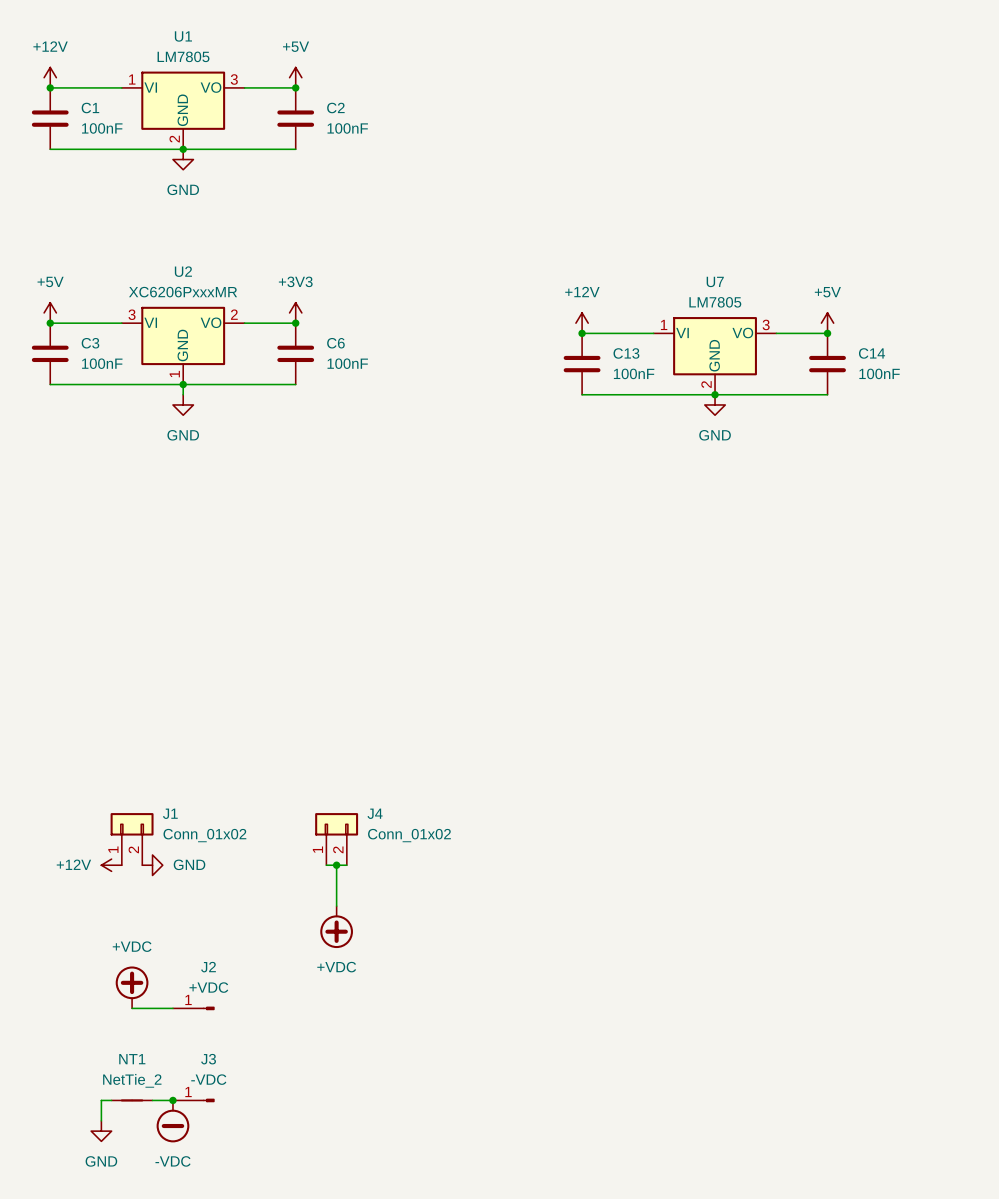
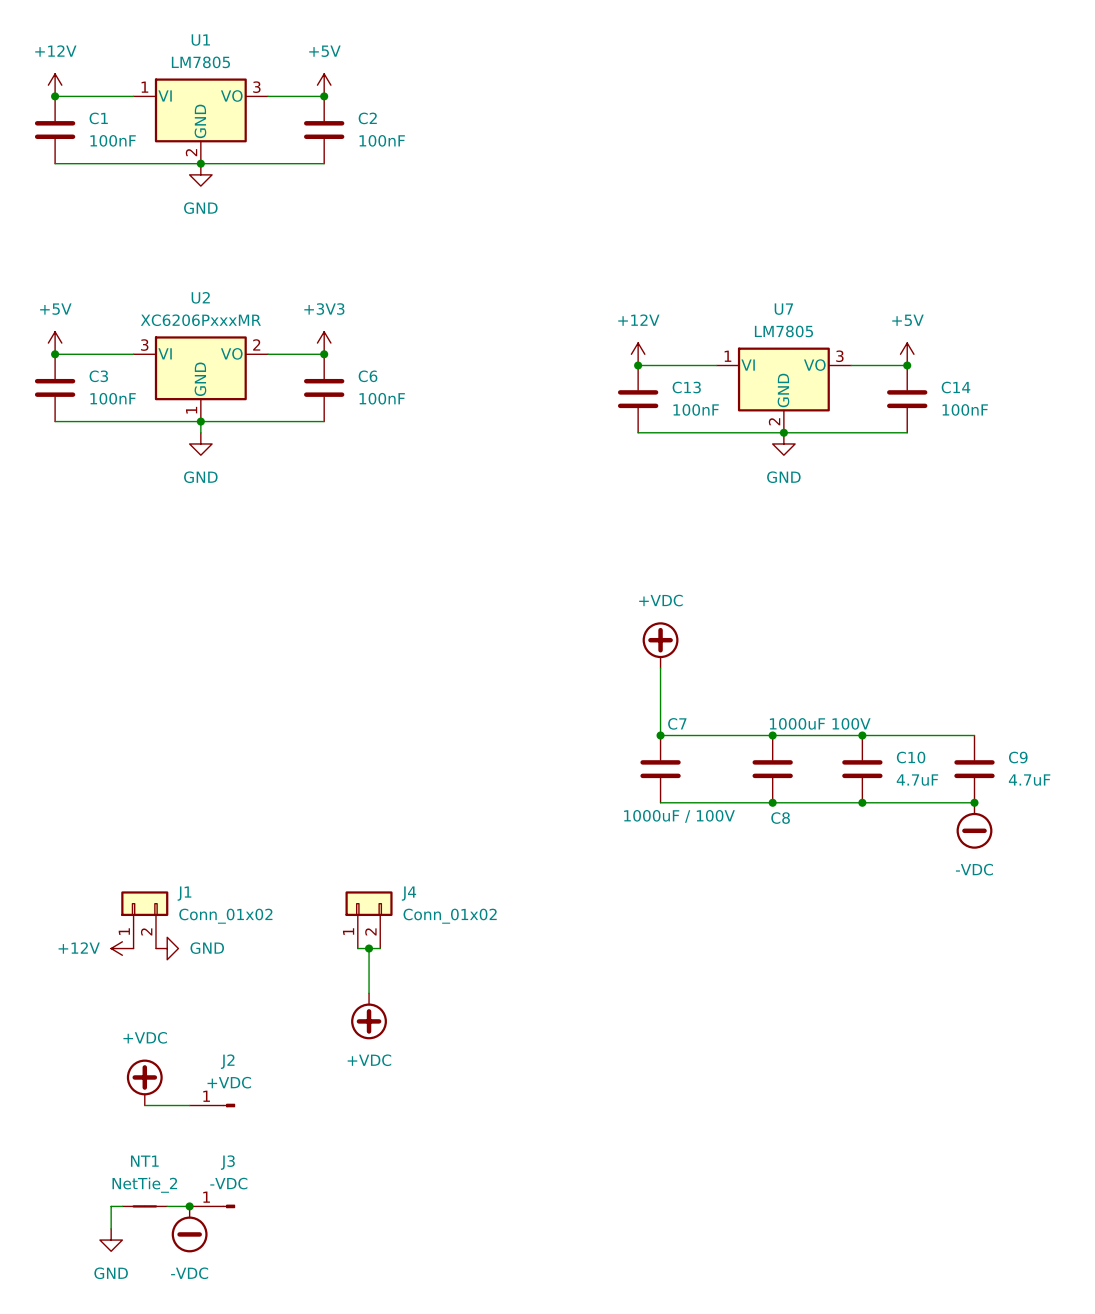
power symbol: none -> +VDC (660, 645)
wire: none -> (660, 668) (660, 735) (974, 735)
junction: none -> (660, 735)
junction: none -> (772, 735)
junction: none -> (862, 735)
C7: none -> 1000uF / 100V (660, 769)
C8: none -> 1000uF 100V (772, 769)
C10: none -> 4.7uF (862, 769)
C9: none -> 4.7uF (974, 769)
wire: none -> (660, 802) (974, 802)
junction: none -> (772, 802)
junction: none -> (862, 802)
junction: none -> (974, 802)
power symbol: none -> -VDC (974, 825)

